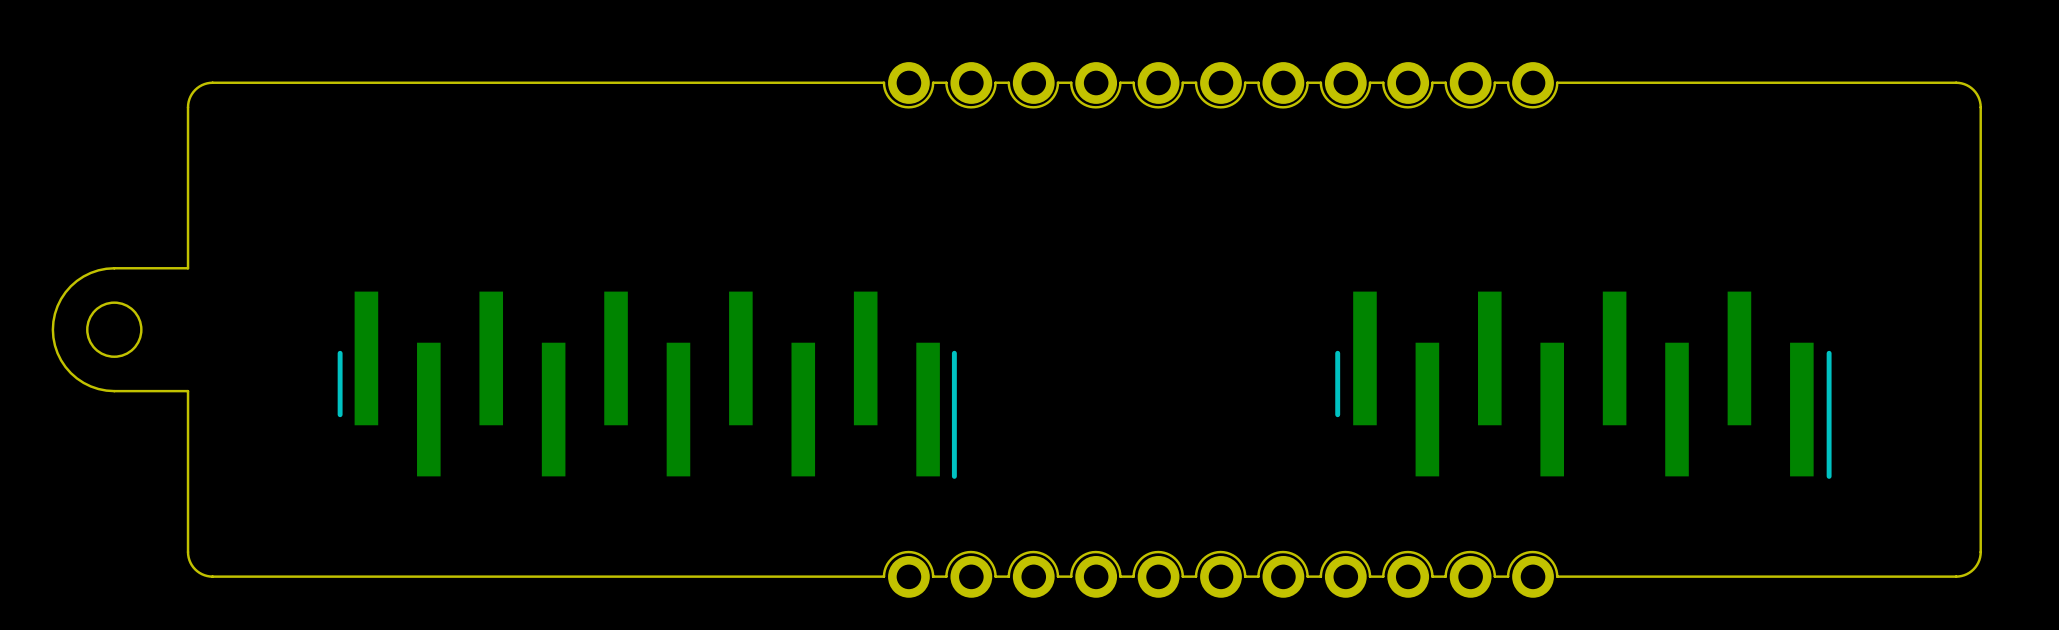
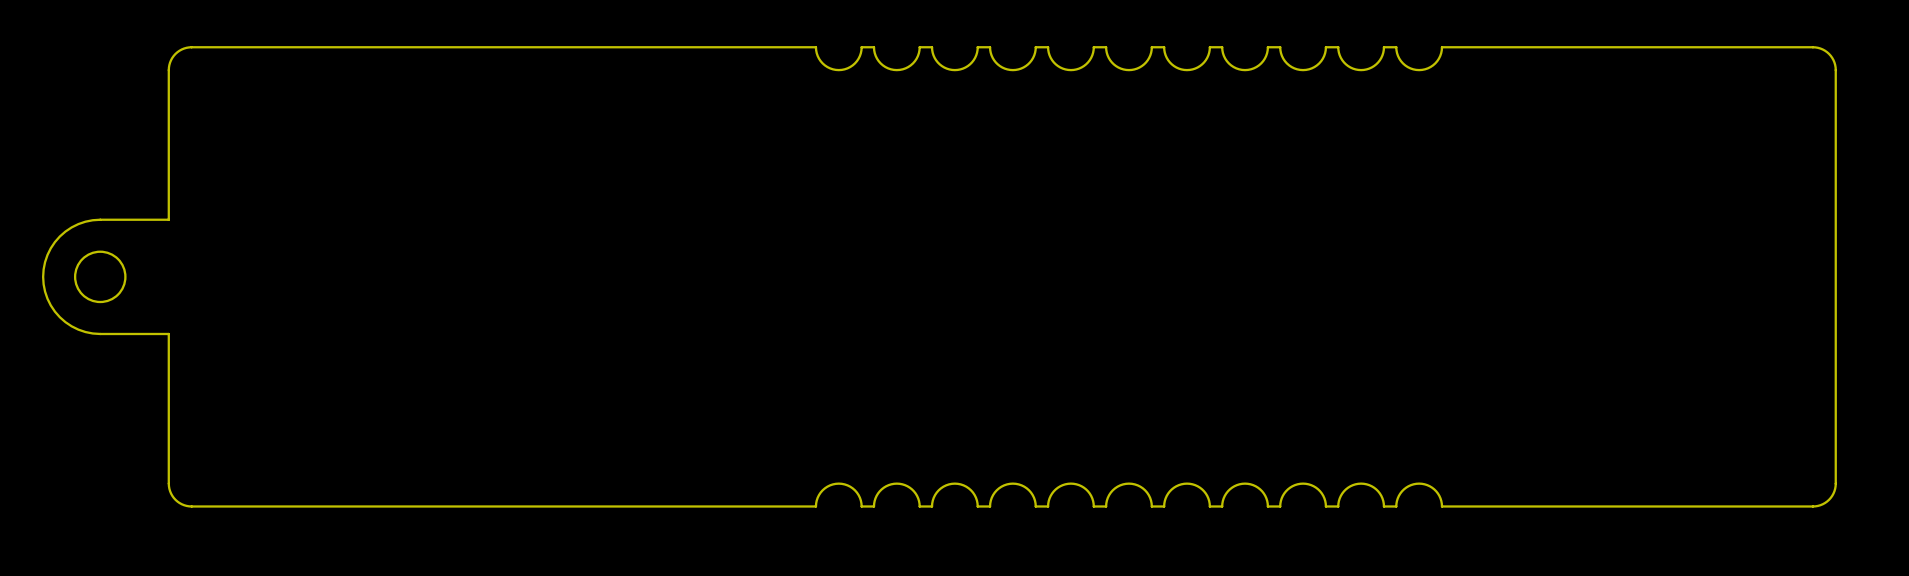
part: (1220, 82) -> none
part: (647, 385) -> none
part: (1583, 385) -> none
part: (1220, 576) -> none

